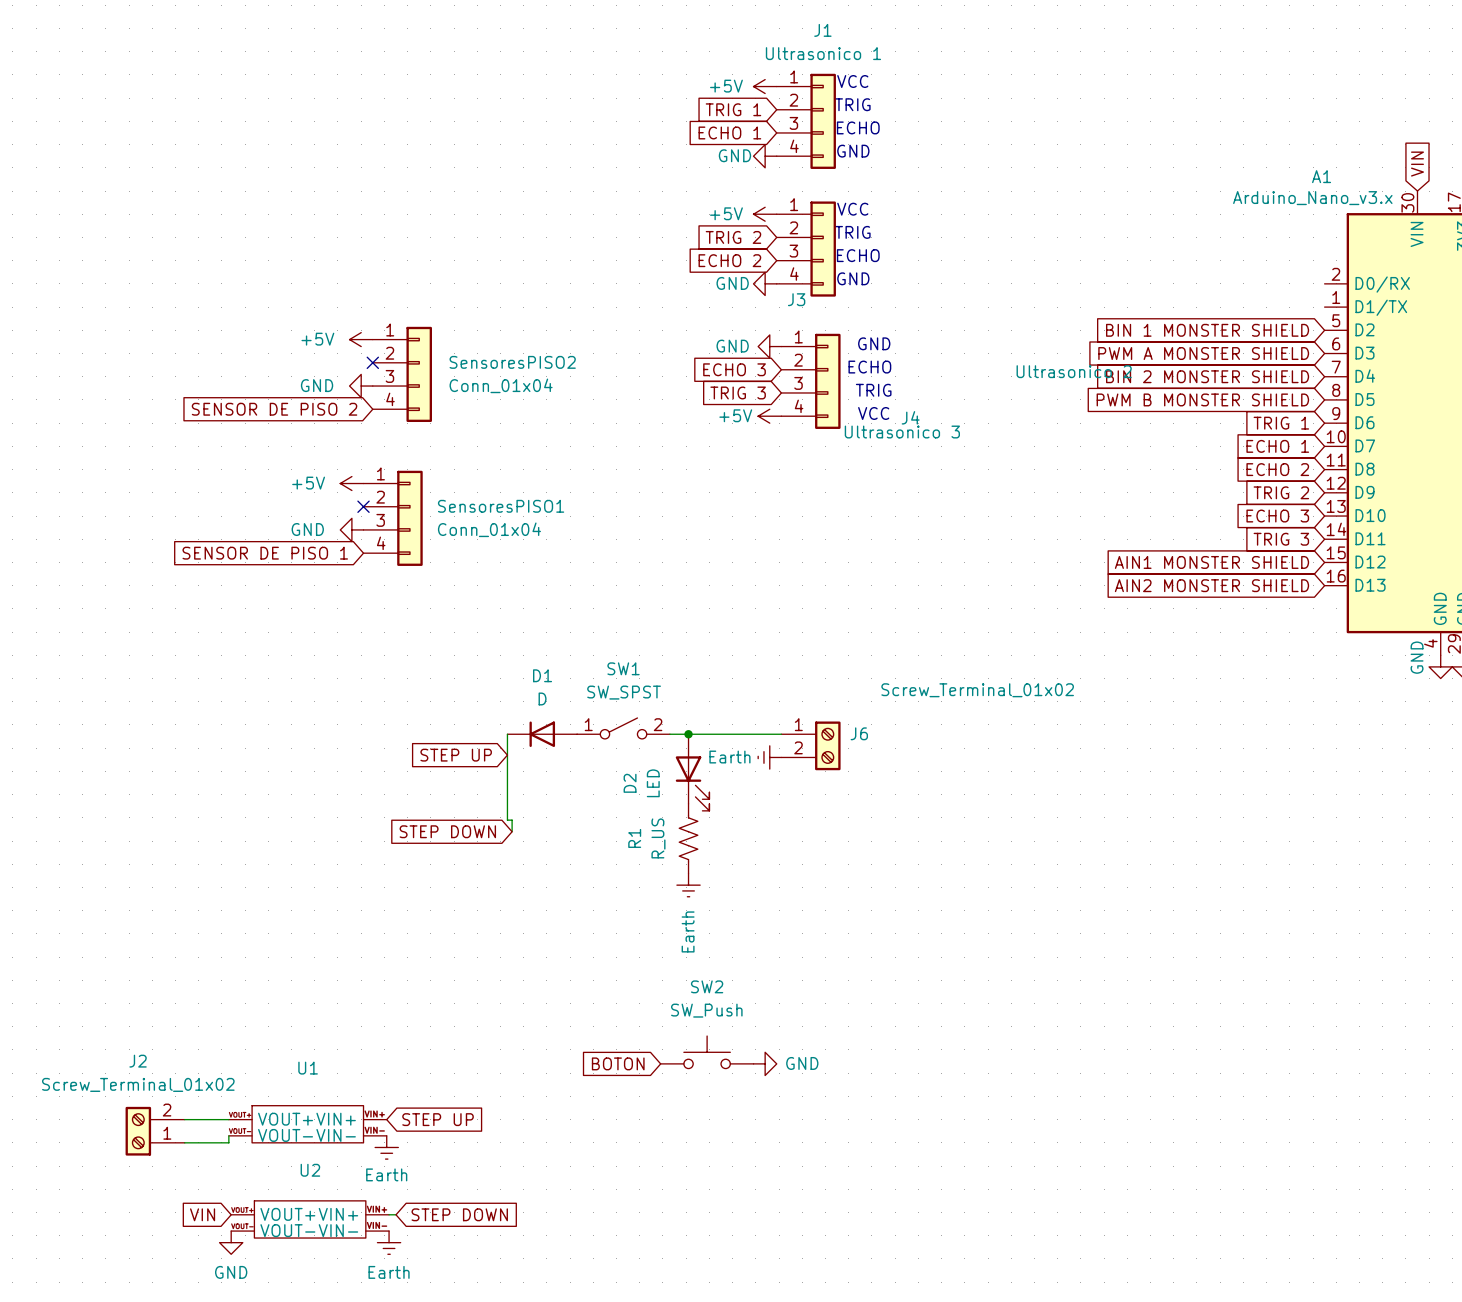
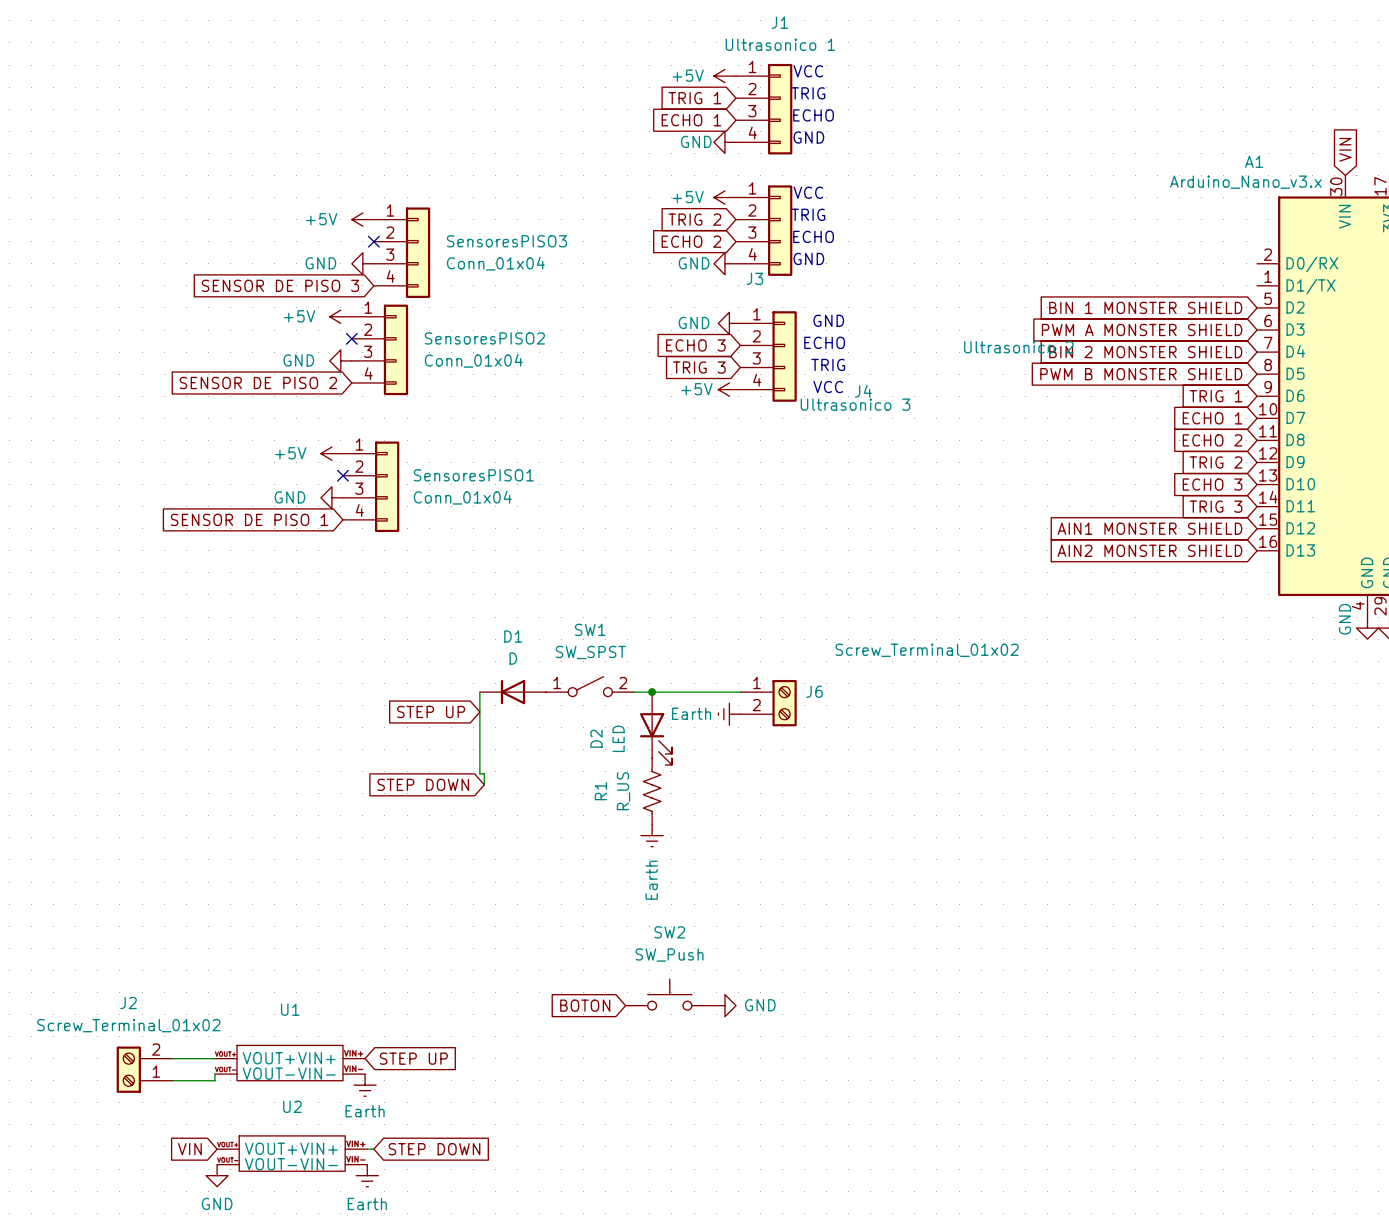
power symbol: none -> +5V (362, 219)
no-connect mark: none -> (373, 241)
SensoresPISO3: none -> Conn_01x04 (402, 252)
power symbol: none -> GND (362, 263)
global label: none -> SENSOR DE PISO 3 (280, 285)

